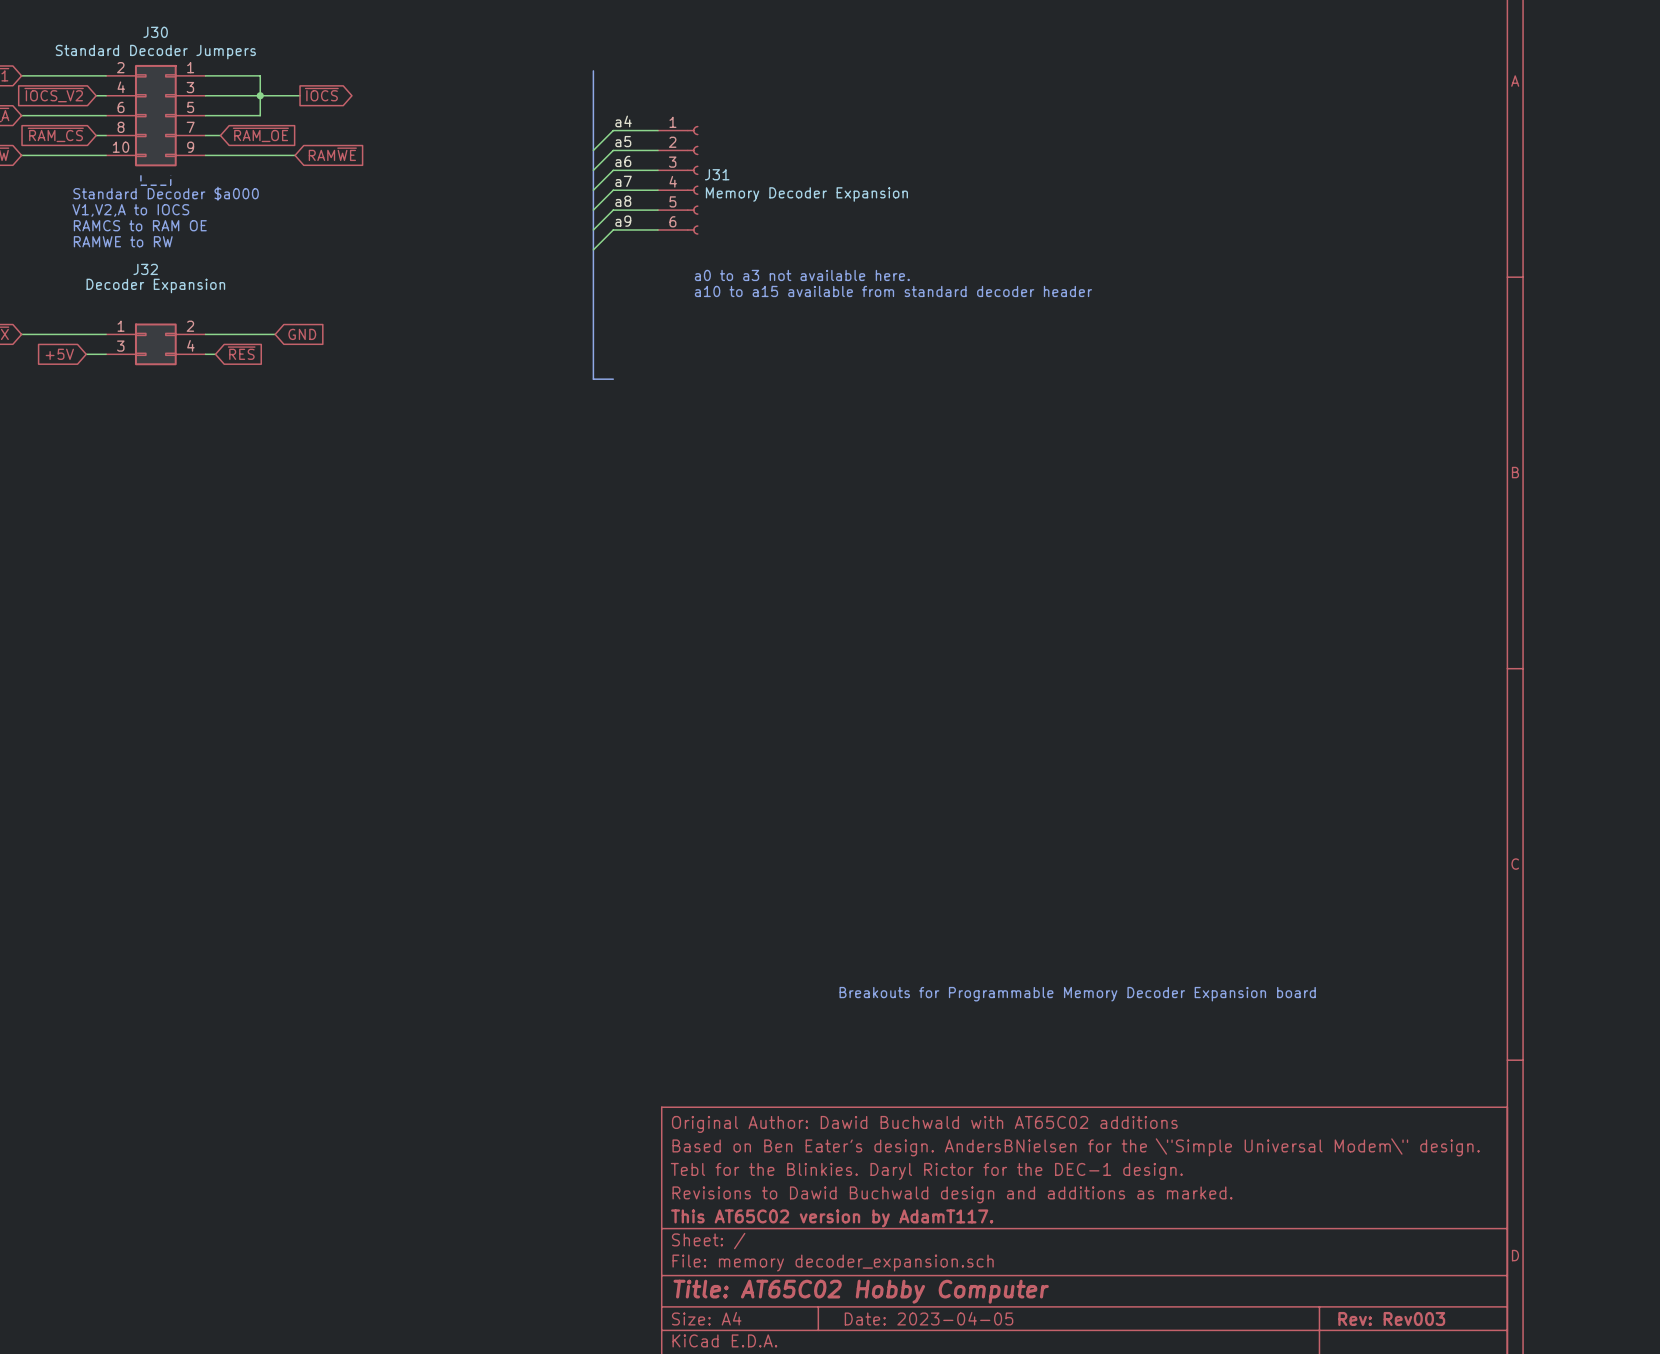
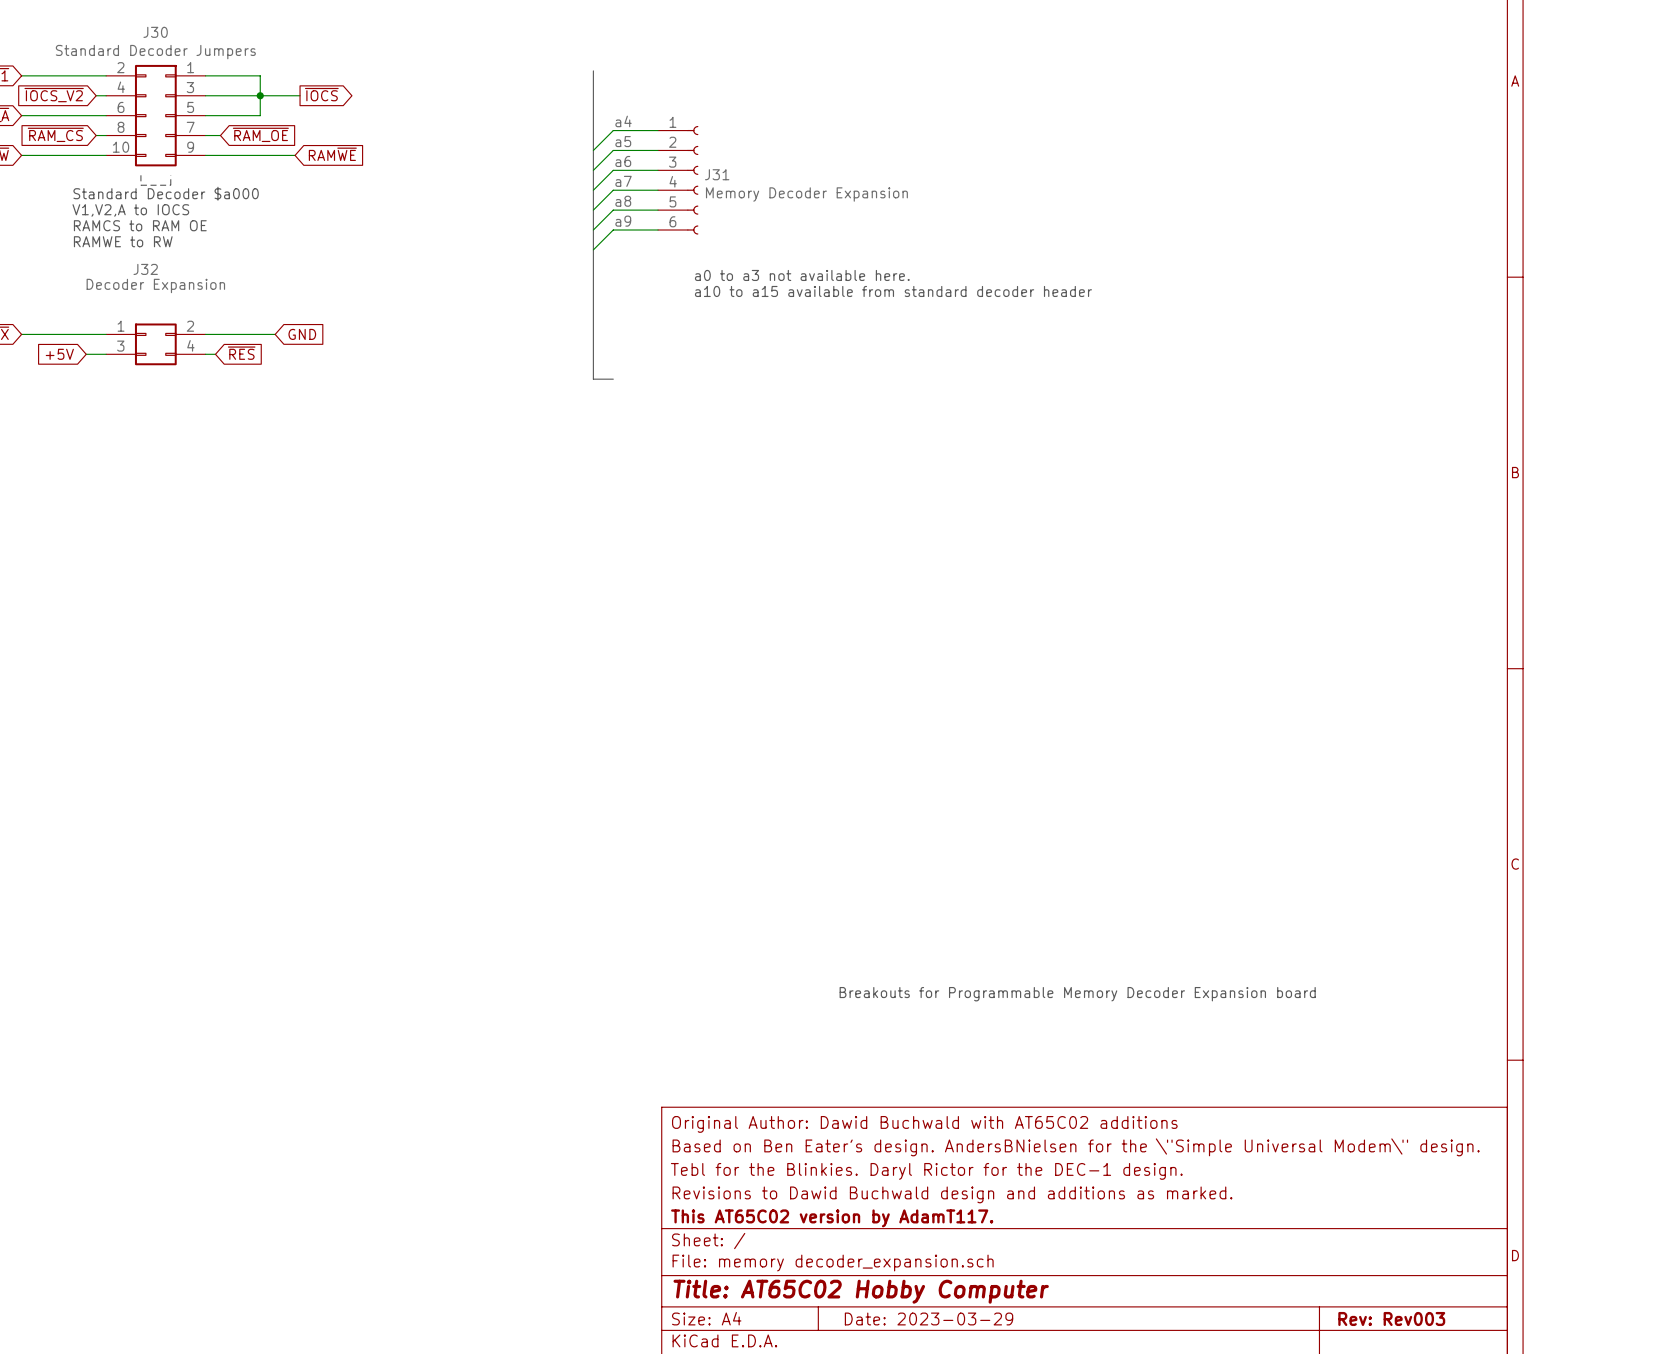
title block: Date: 2023-04-05 (929, 1318) -> Date: 2023-03-29 (929, 1318)

